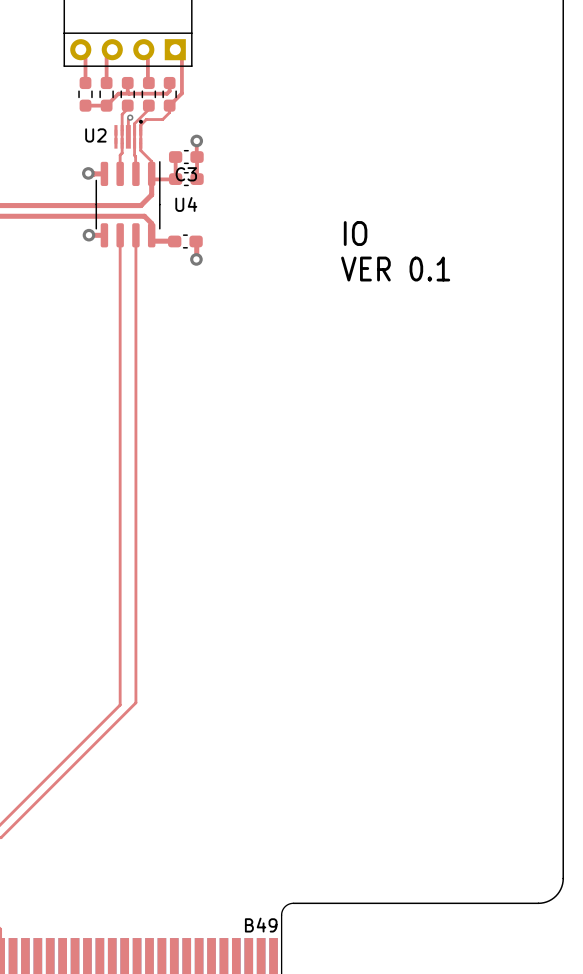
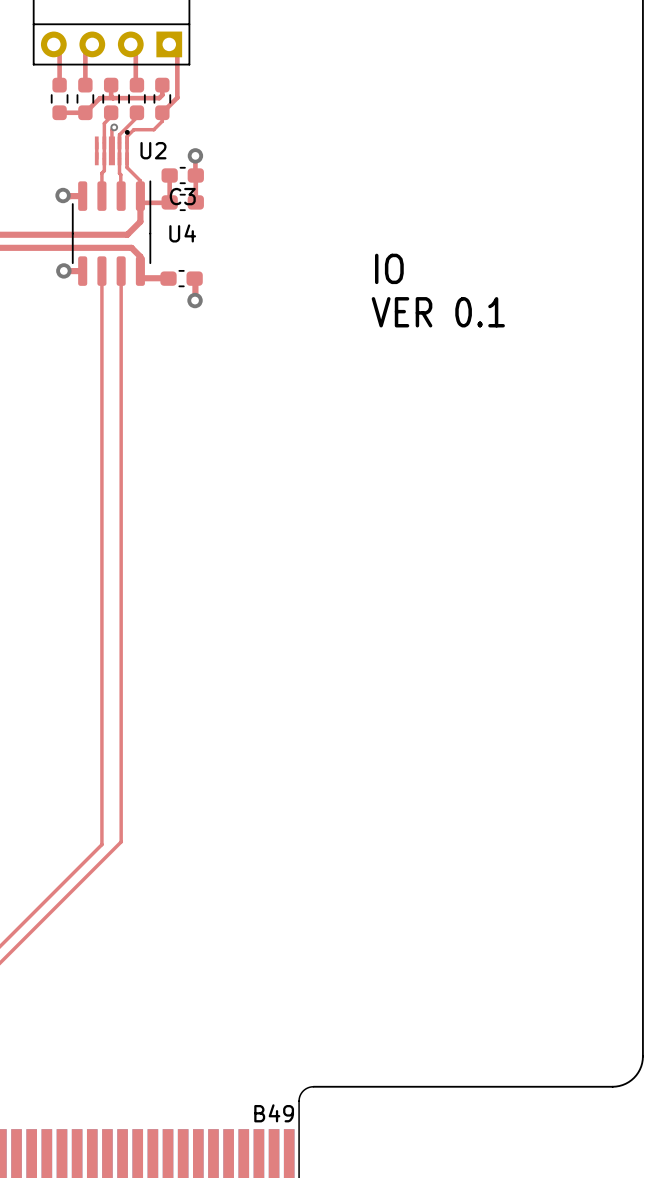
U2 name position: U2 (95, 135) -> U2 (153, 150)

